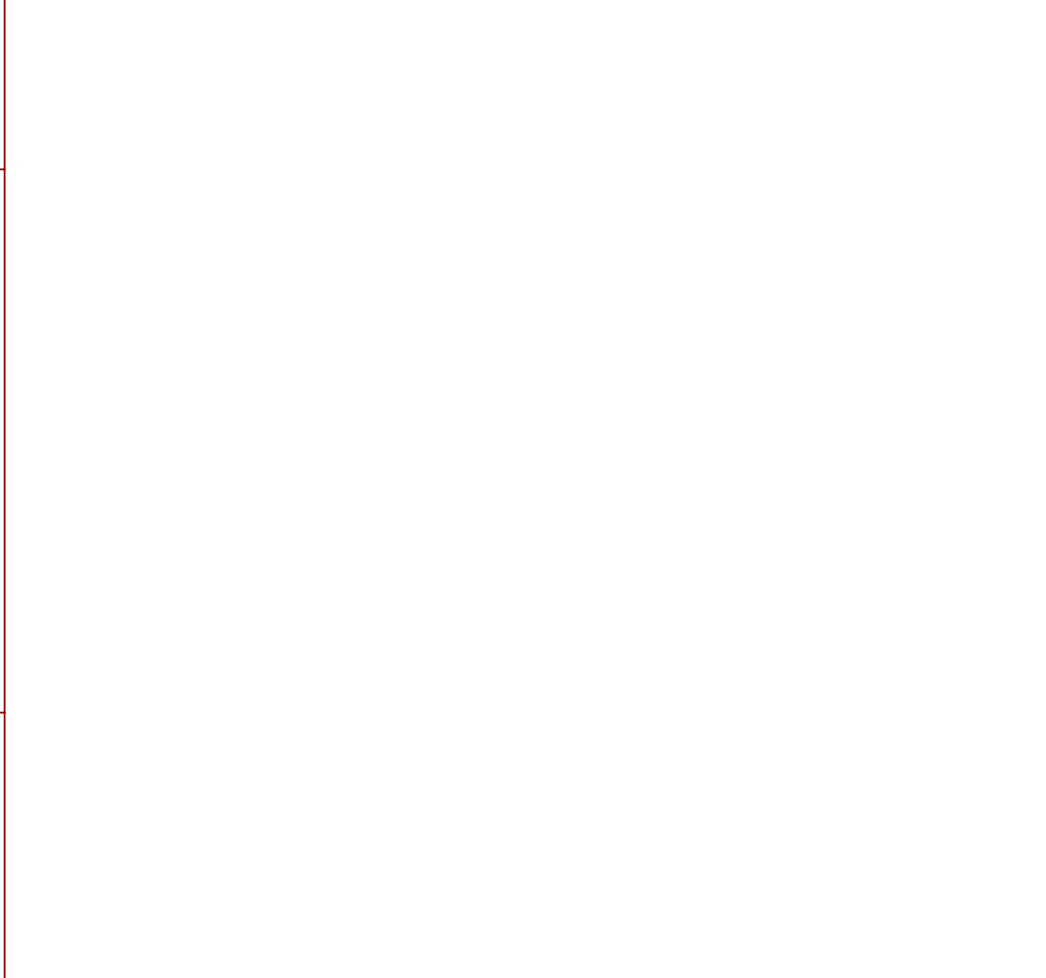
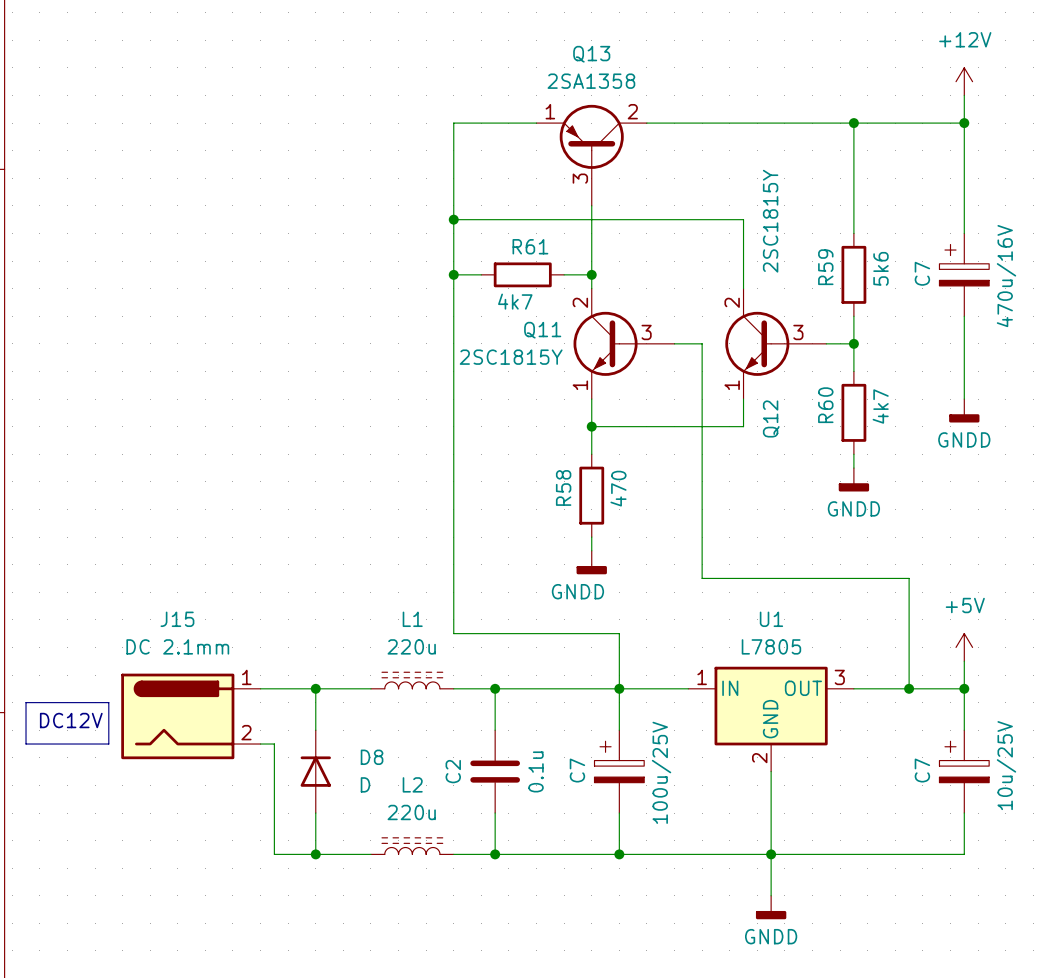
power symbol: none -> +12V (964, 81)
wire: none -> (964, 95) (964, 233)
wire: none -> (536, 123) (453, 123) (453, 633) (619, 633) (619, 730)
wire: none -> (646, 123) (964, 123)
wire: none -> (853, 123) (853, 233)
junction: none -> (853, 123)
junction: none -> (964, 123)
Q13: none -> 2SA1358 (591, 155)
wire: none -> (591, 205) (591, 288)
wire: none -> (453, 219) (743, 219) (743, 288)
junction: none -> (453, 219)
wire: none -> (453, 274) (481, 274)
junction: none -> (453, 274)
R61: none -> 4k7 (522, 274)
wire: none -> (564, 274) (591, 274)
junction: none -> (591, 274)
R59: none -> 5k6 (853, 274)
C7: none -> 470u/16V (964, 274)
wire: none -> (853, 316) (853, 371)
wire: none -> (964, 316) (964, 399)
Q11: none -> 2SC1815Y (624, 343)
wire: none -> (674, 343) (702, 343) (702, 578) (909, 578) (909, 688)
Q12: none -> 2SC1815Y (775, 343)
wire: none -> (826, 343) (853, 343)
junction: none -> (853, 343)
wire: none -> (591, 399) (591, 454)
wire: none -> (743, 399) (743, 426) (591, 426)
power symbol: none -> GNDD (964, 410)
R60: none -> 4k7 (853, 412)
junction: none -> (591, 426)
wire: none -> (853, 454) (853, 468)
power symbol: none -> GNDD (853, 479)
R58: none -> 470 (591, 495)
wire: none -> (591, 537) (591, 550)
power symbol: none -> GNDD (591, 562)
power symbol: none -> +5V (964, 647)
wire: none -> (964, 661) (964, 730)
L1: none -> 220u (412, 680)
wire: none -> (260, 688) (370, 688)
wire: none -> (315, 688) (315, 730)
junction: none -> (315, 688)
wire: none -> (453, 688) (688, 688)
wire: none -> (495, 688) (495, 730)
junction: none -> (495, 688)
junction: none -> (619, 688)
wire: none -> (853, 688) (964, 688)
junction: none -> (909, 688)
junction: none -> (964, 688)
line: none -> (26, 702) (108, 702) (108, 744) (26, 744) (26, 702)
J15: none -> DC 2.1mm (190, 716)
U1: none -> L7805 (771, 719)
text: none -> DC12V (71, 720)
wire: none -> (260, 744) (274, 744) (274, 854) (370, 854)
D8: none -> D (315, 771)
C2: none -> 0.1u (495, 771)
C7: none -> 100u/25V (619, 771)
wire: none -> (771, 771) (771, 895)
C7: none -> 10u/25V (964, 771)
wire: none -> (315, 813) (315, 854)
wire: none -> (495, 813) (495, 854)
wire: none -> (619, 813) (619, 854)
wire: none -> (964, 813) (964, 854) (453, 854)
L2: none -> 220u (412, 846)
junction: none -> (315, 854)
junction: none -> (495, 854)
junction: none -> (619, 854)
junction: none -> (771, 854)
power symbol: none -> GNDD (771, 907)

